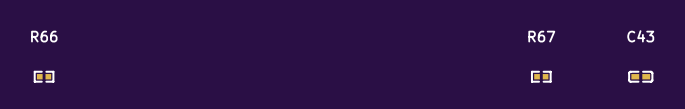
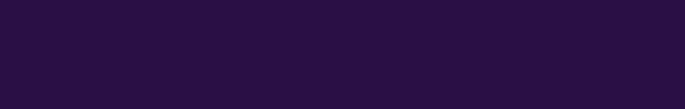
R66: (44, 76) -> none
R67: (541, 76) -> none
C43: (640, 76) -> none

